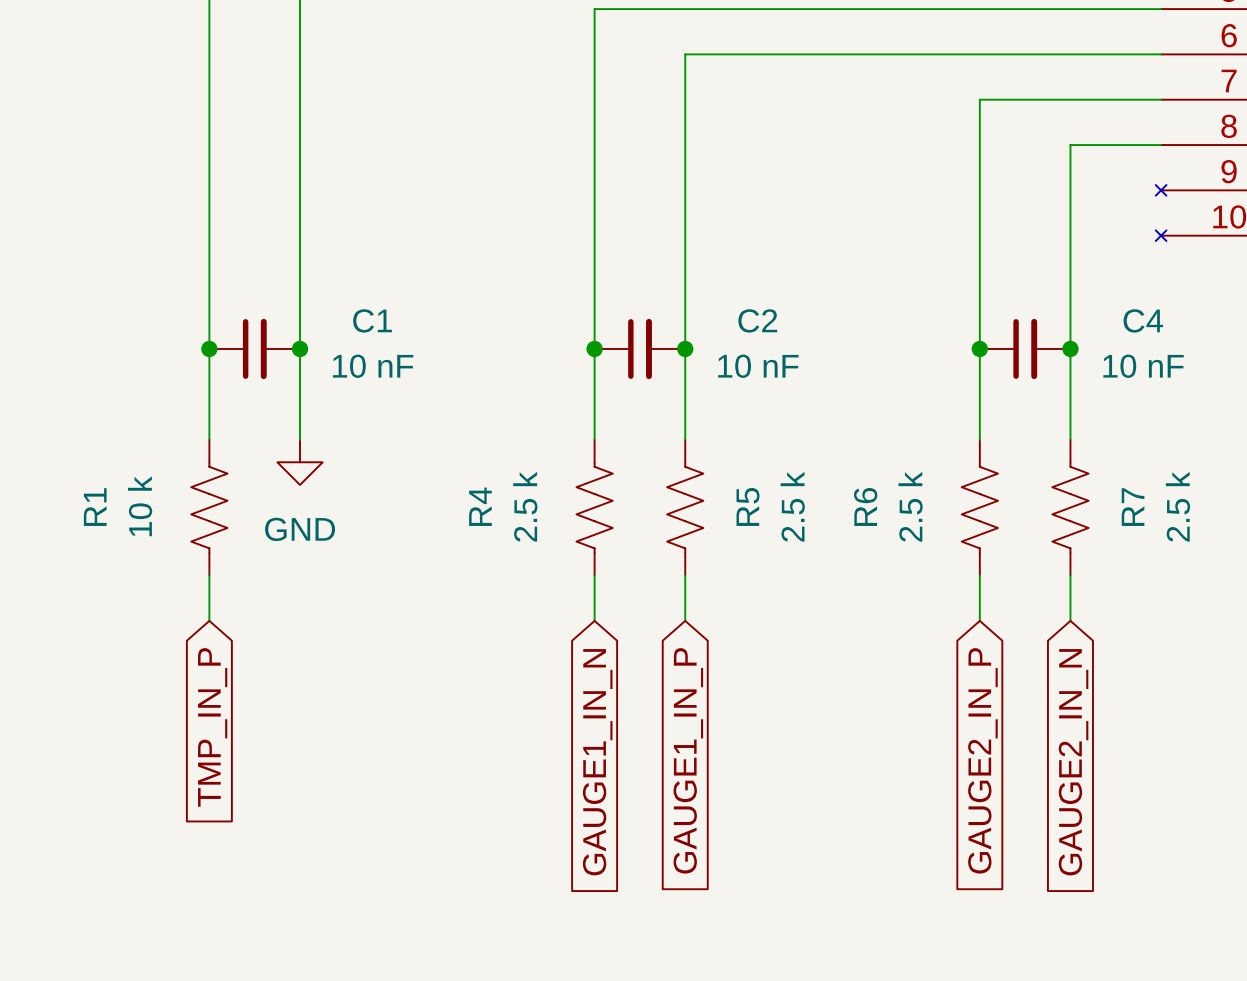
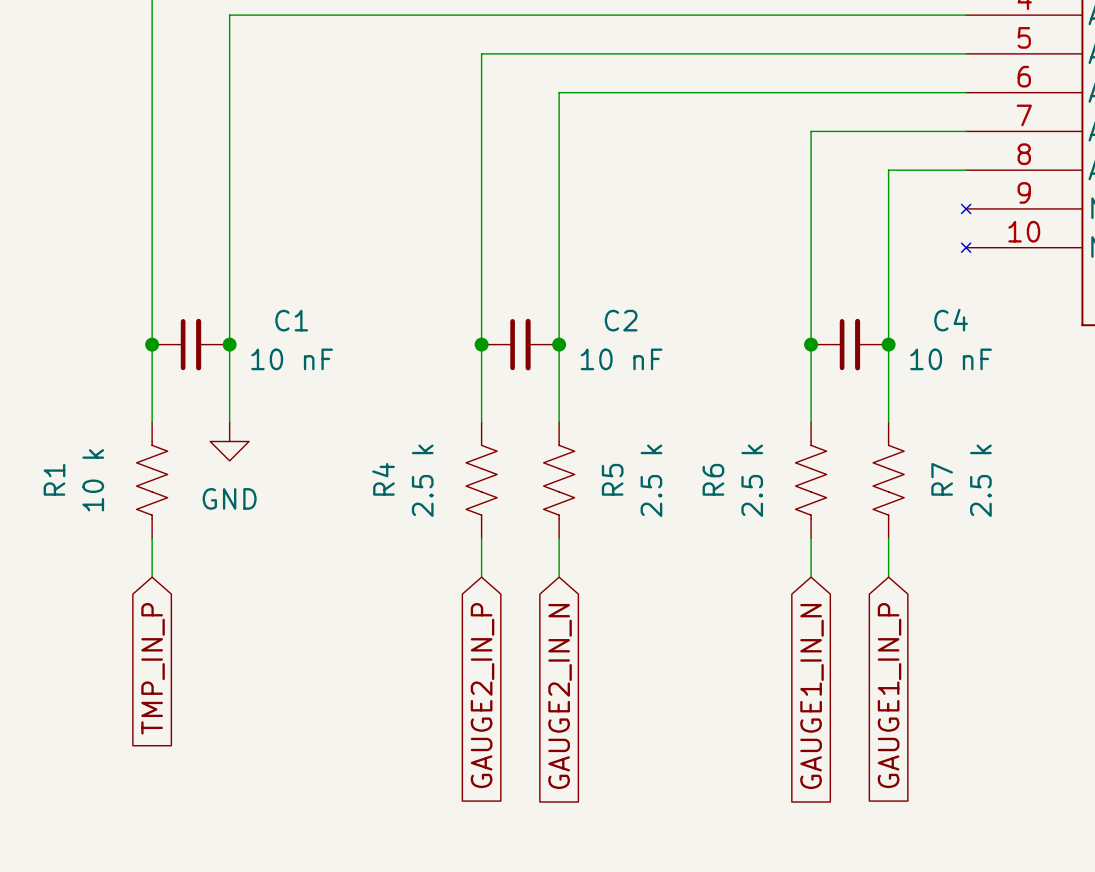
global label: GAUGE1_IN_P (688, 760) -> GAUGE2_IN_N (560, 696)
global label: GAUGE2_IN_P (982, 760) -> GAUGE1_IN_N (812, 696)
global label: GAUGE1_IN_N (597, 762) -> GAUGE2_IN_P (482, 695)
global label: GAUGE2_IN_N (1073, 762) -> GAUGE1_IN_P (889, 695)

